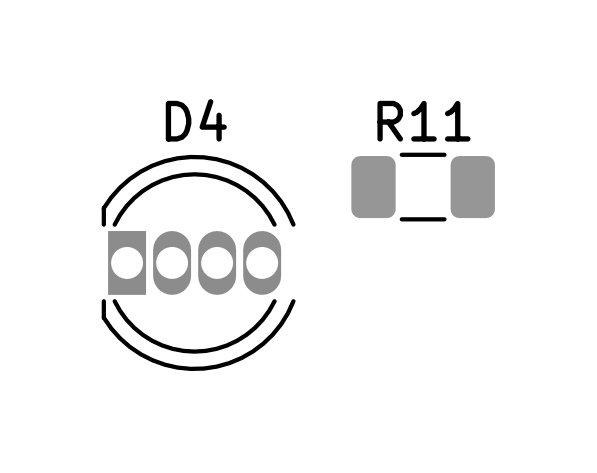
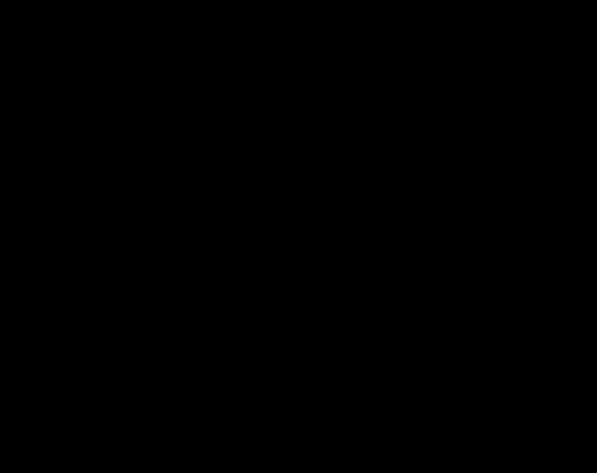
R11: (423, 187) -> none
D4: (198, 262) -> none

